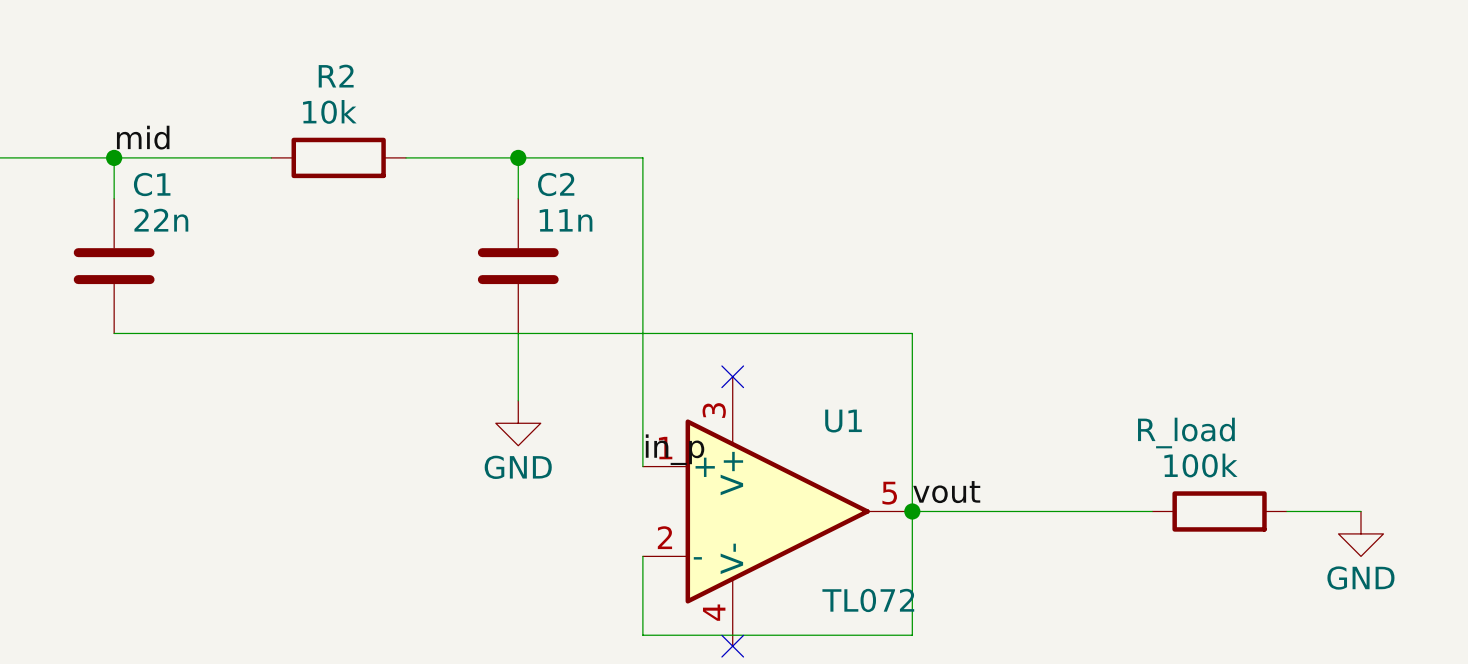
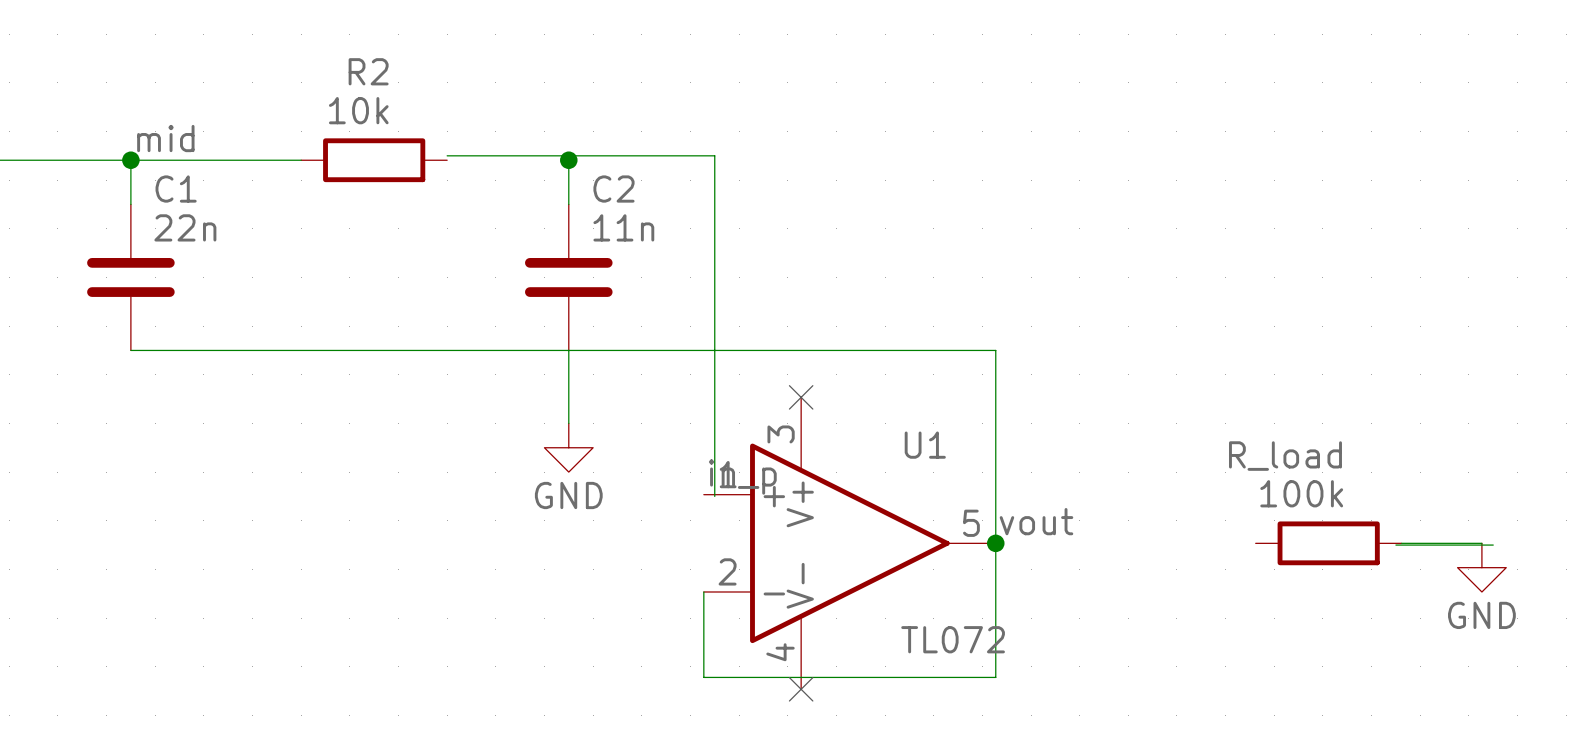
wire: none -> (447, 155) (714, 155) (714, 496)
wire: (406, 157) (642, 157) (642, 466) -> none
wire: (912, 511) (1152, 511) -> none
wire: none -> (1395, 545) (1493, 545)

